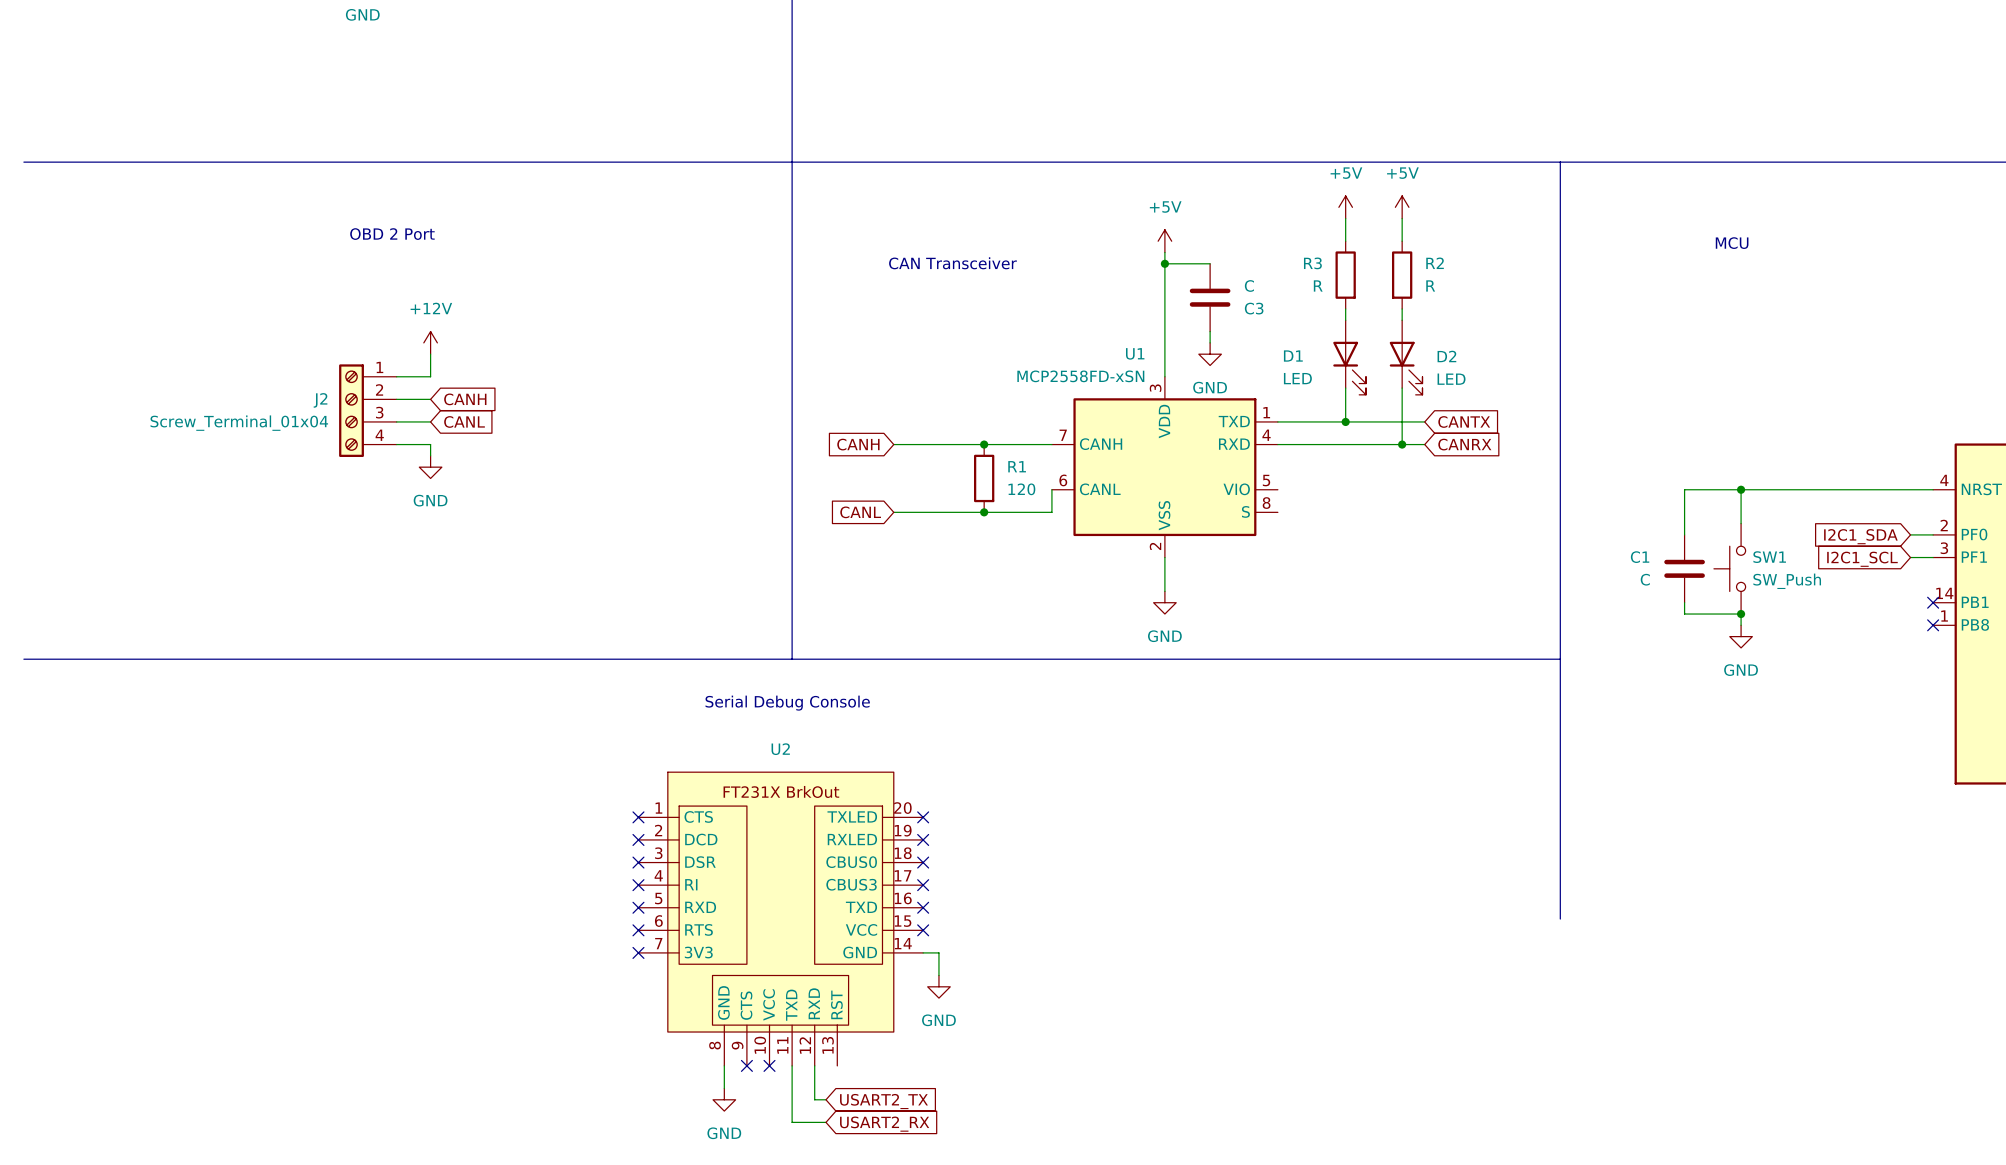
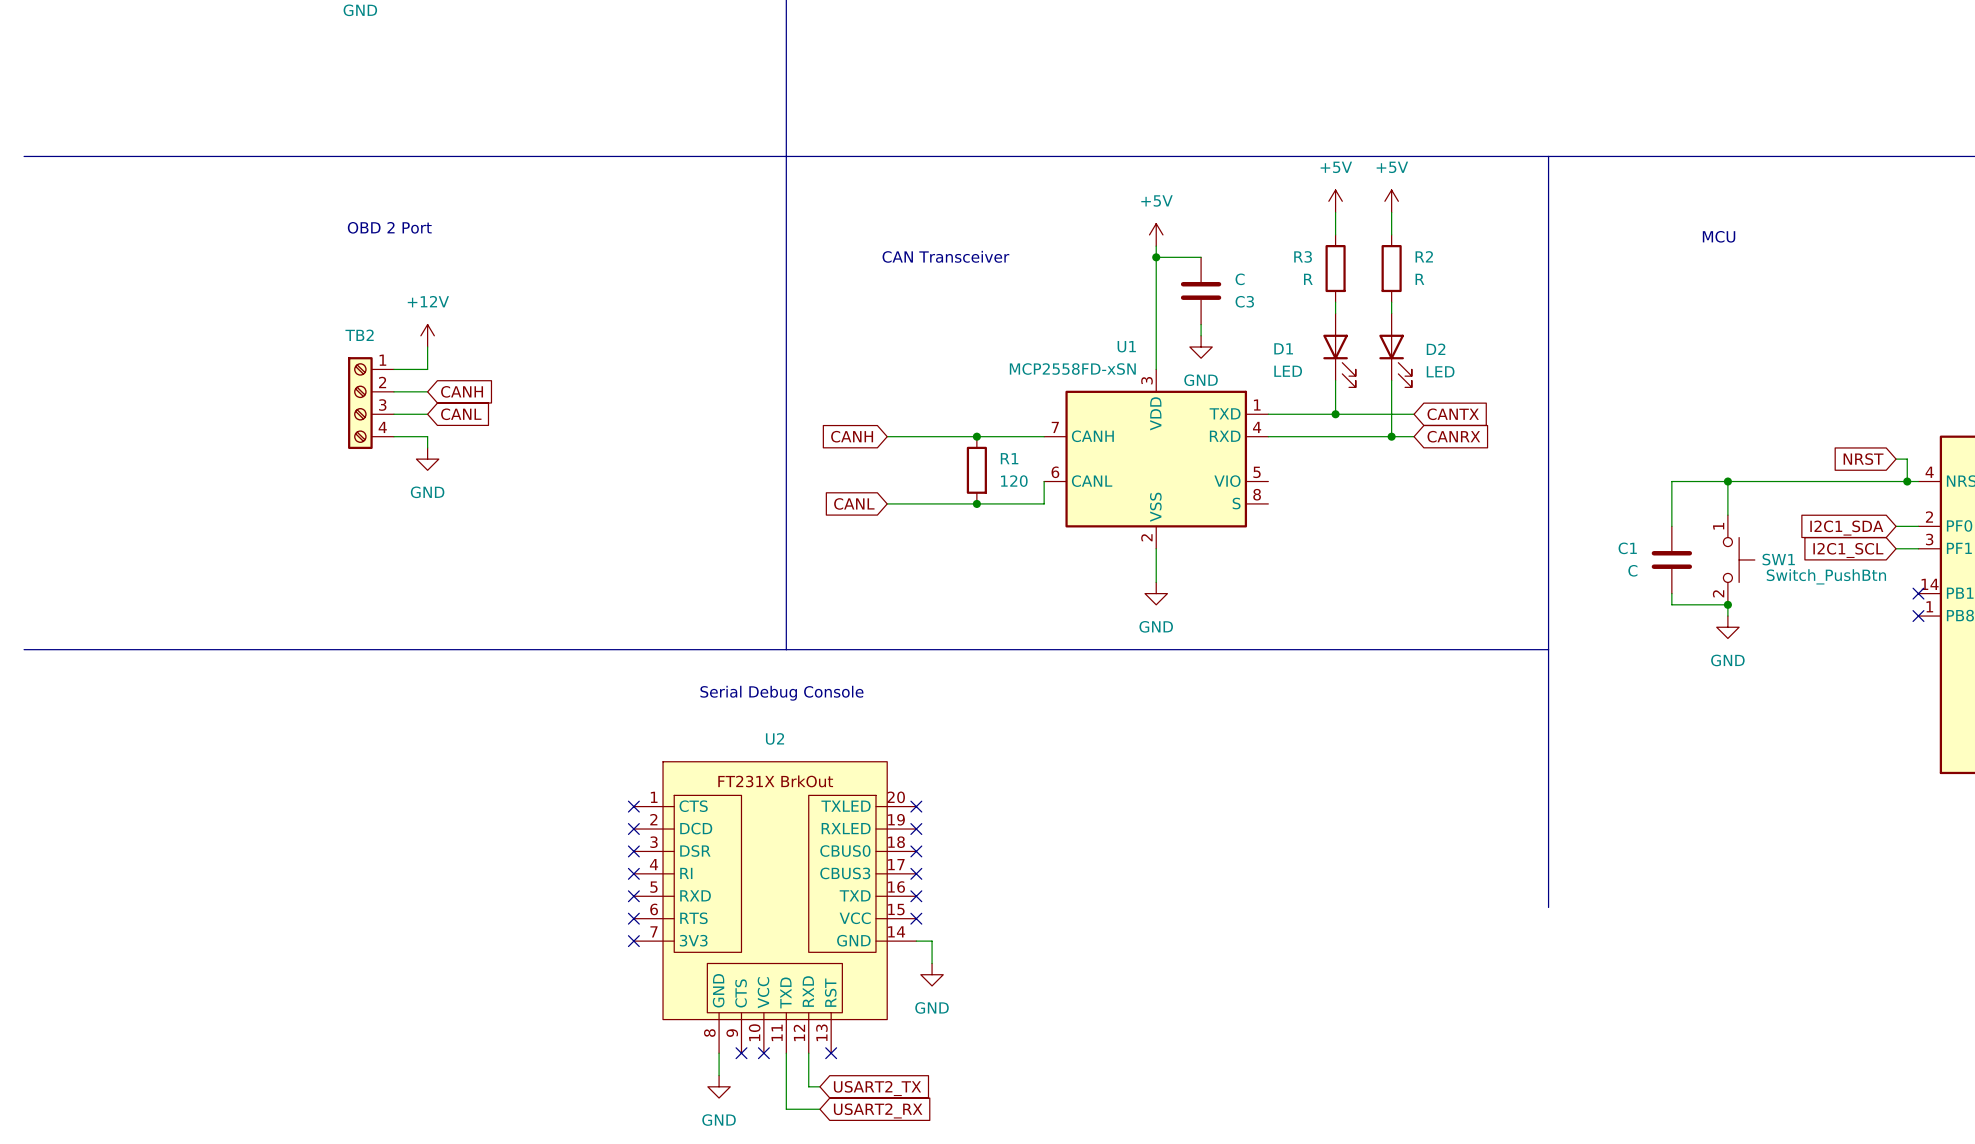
J2: Screw_Terminal_01x04 (367, 410) -> none
TB2: none -> (371, 403)
global label: none -> NRST (1863, 459)
wire: none -> (1896, 459) (1907, 459) (1907, 481)
junction: none -> (1907, 481)
SW1 symbol: [1713, 523, 1746, 615] -> [1723, 515, 1755, 605]
SW1 value: SW_Push (1787, 581) -> Switch_PushBtn (1826, 576)
no-connect mark: none -> (831, 1053)

